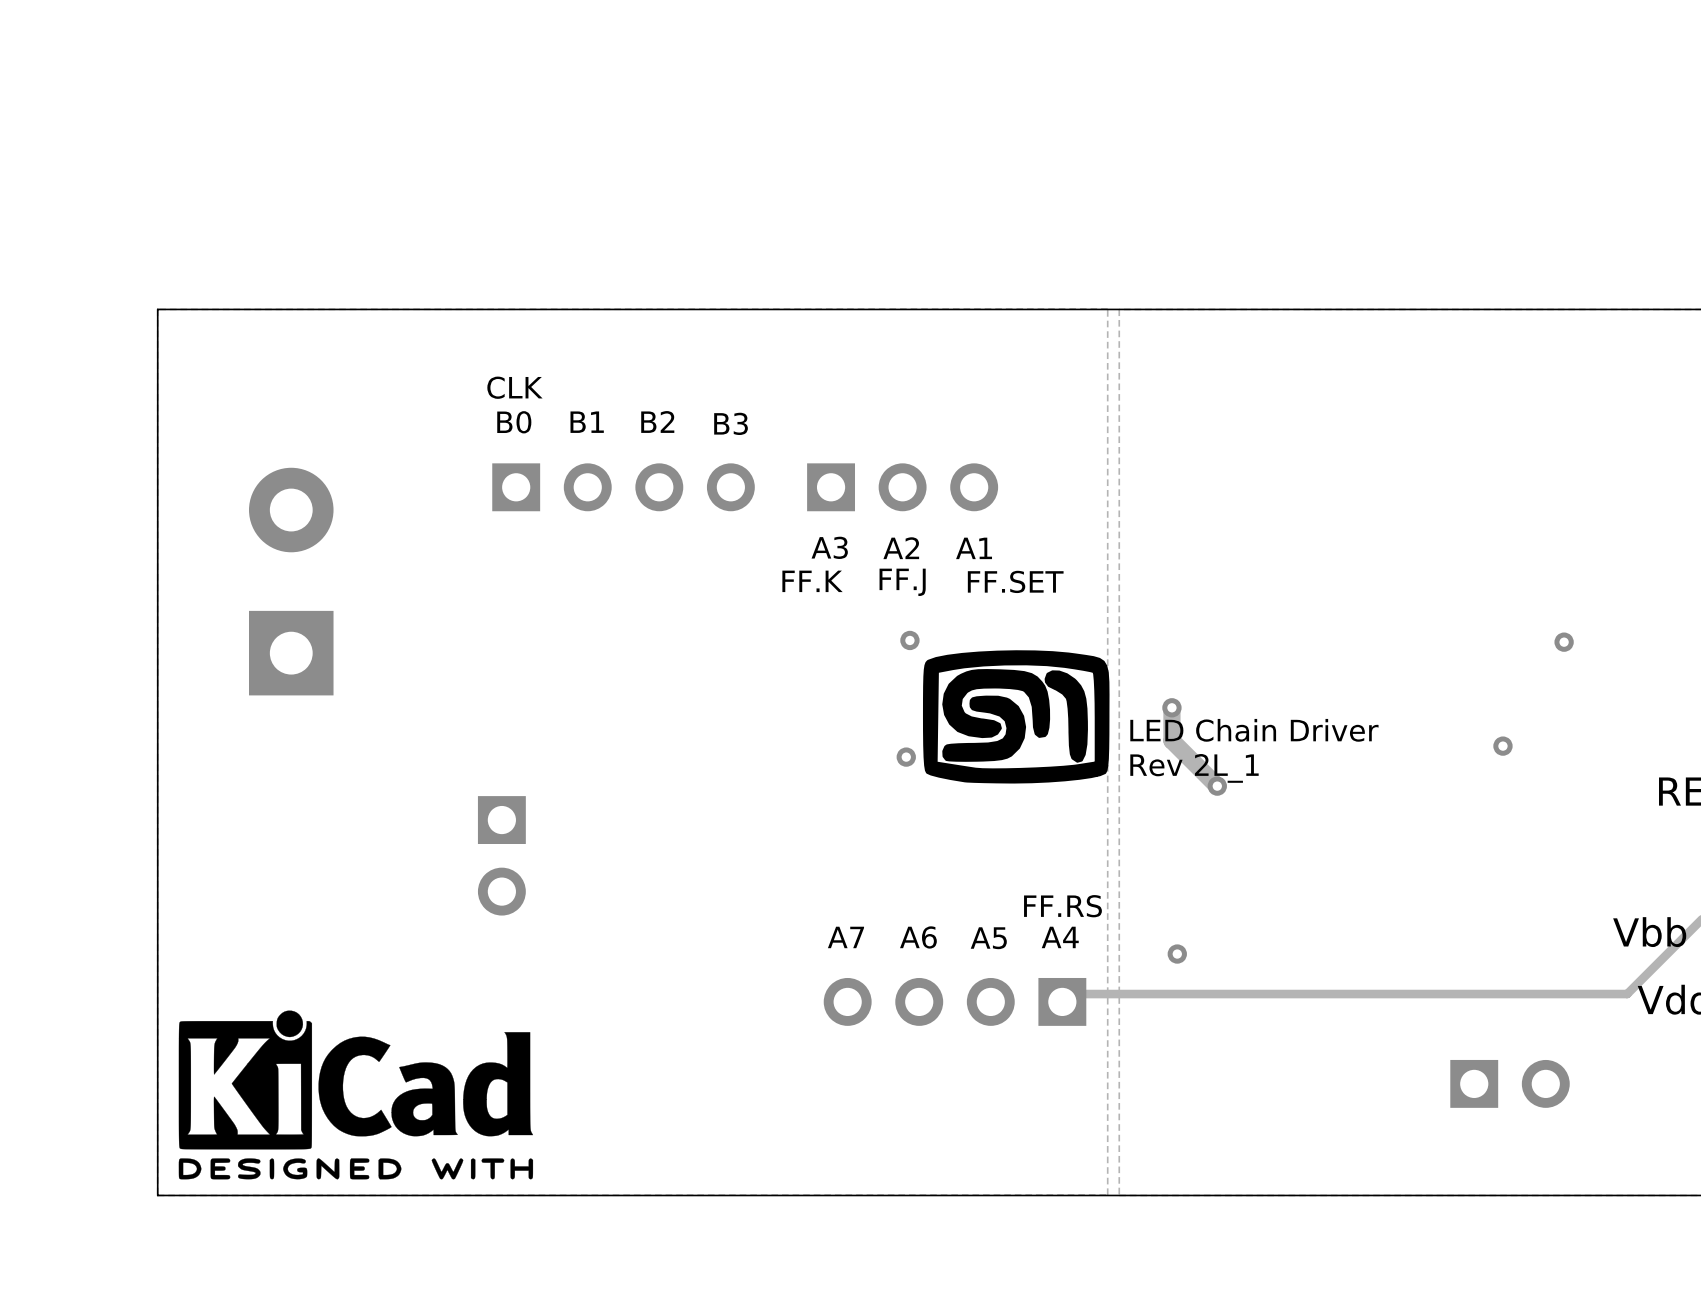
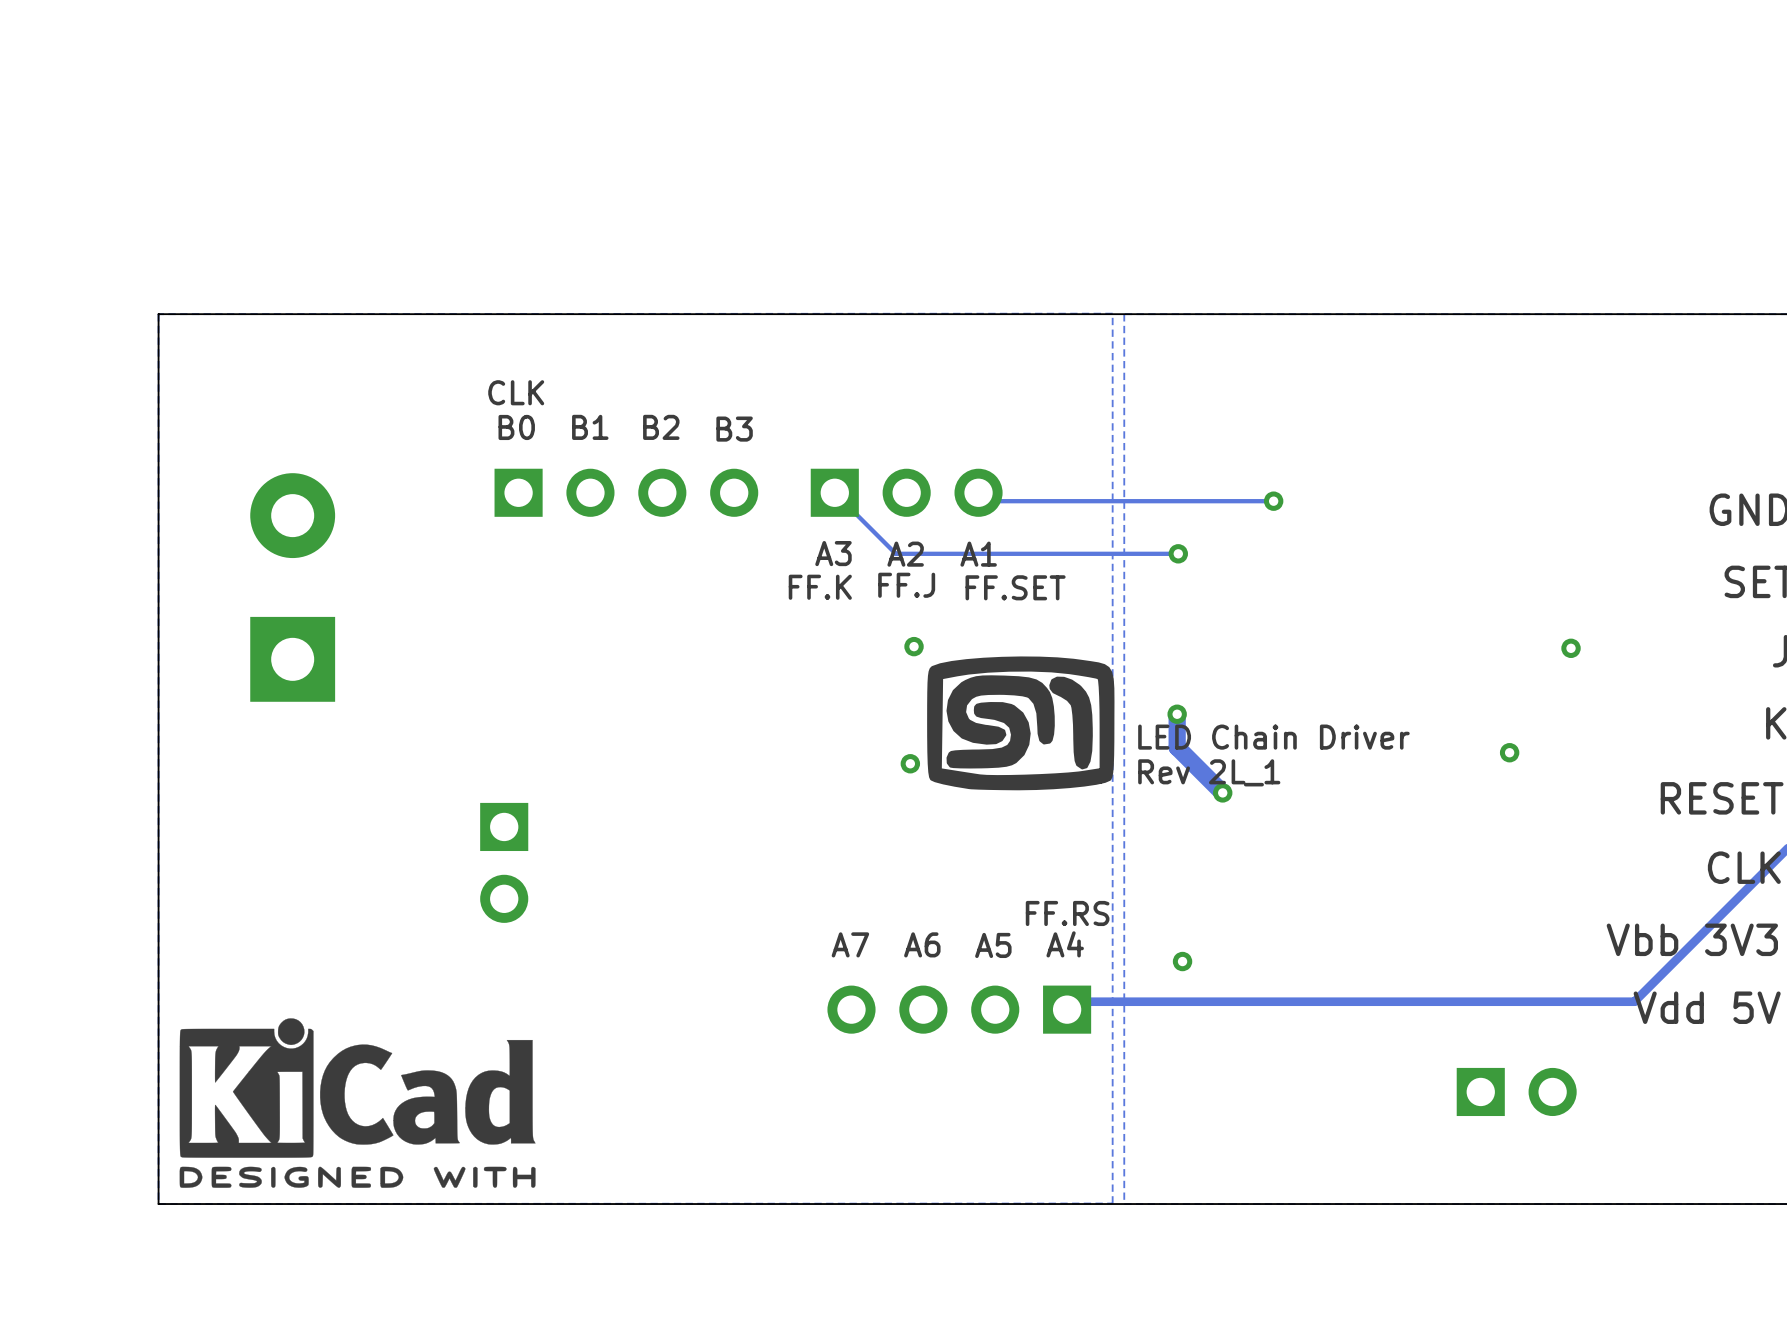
track: none -> (834, 492) (895, 553) (1178, 553)
track: none -> (978, 492) (986, 501) (1273, 501)
via: none -> (1273, 501)
via: none -> (1178, 553)

